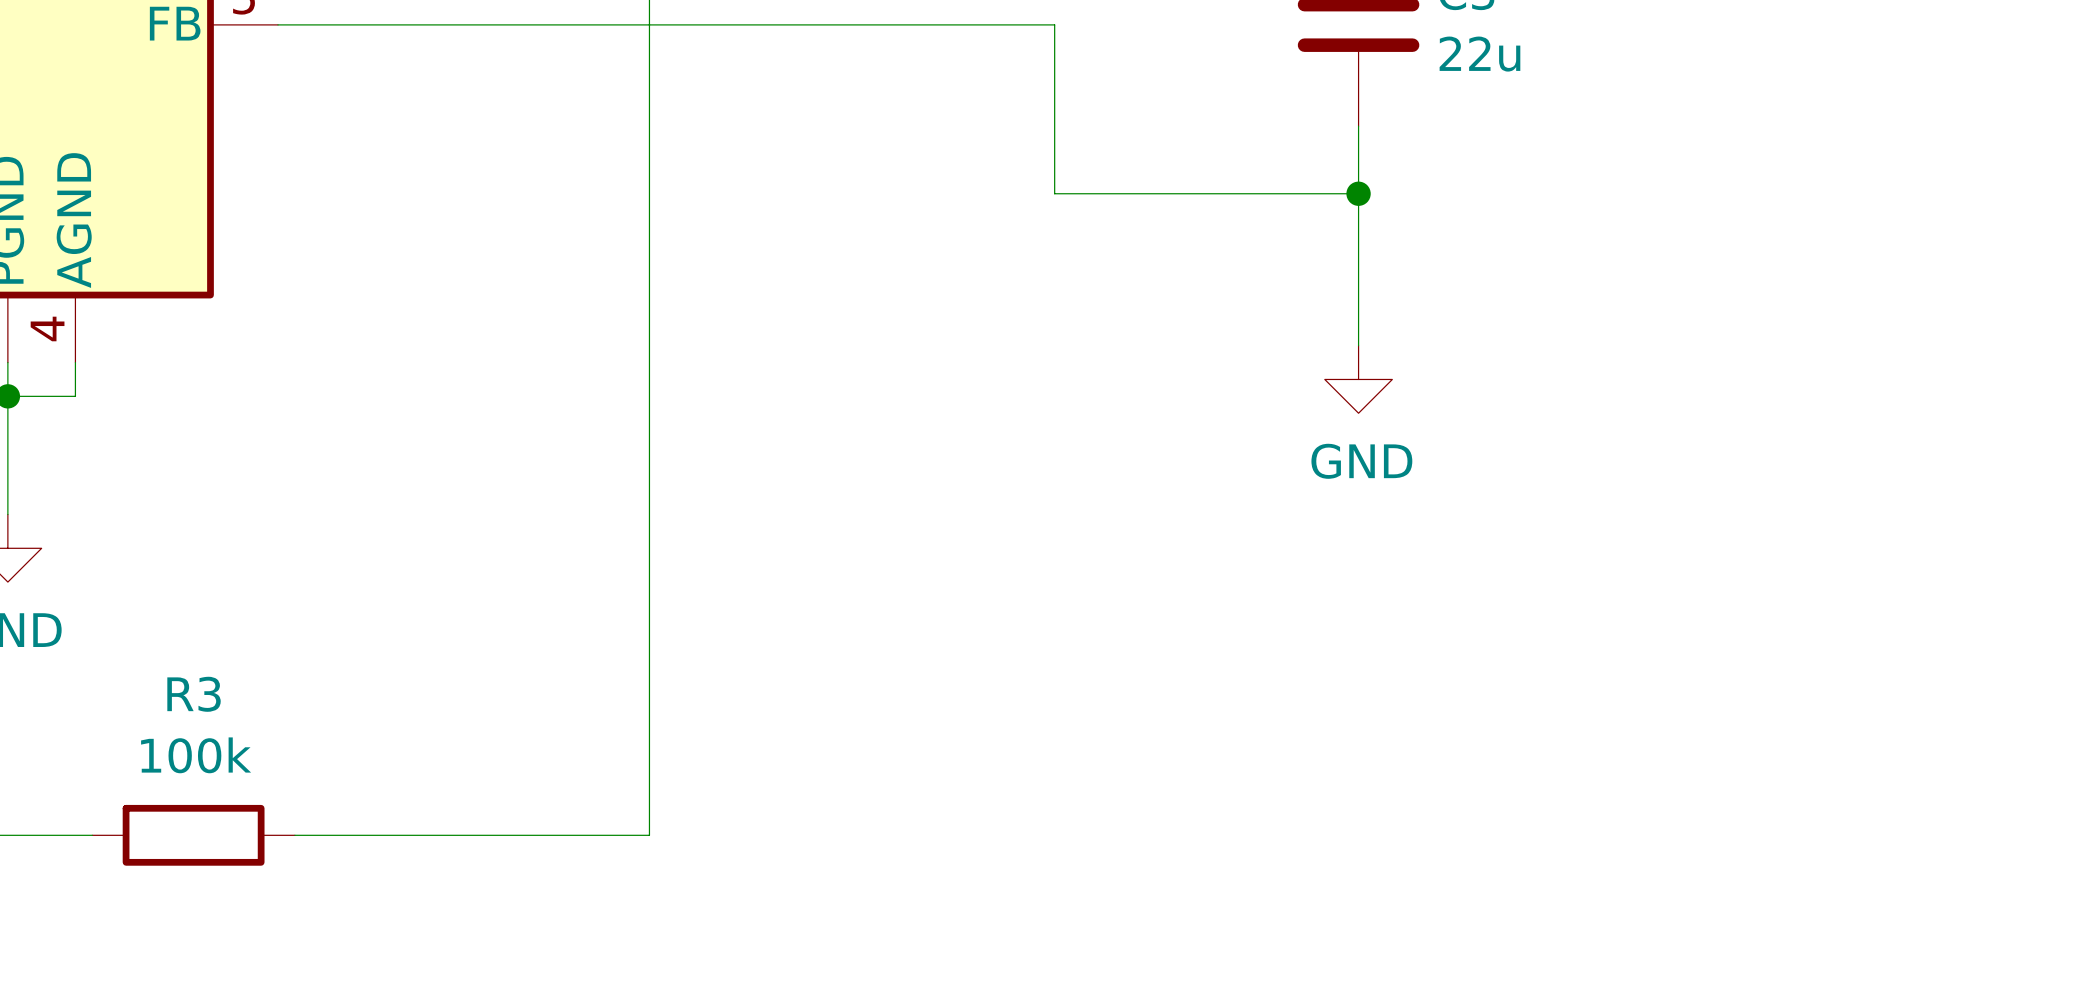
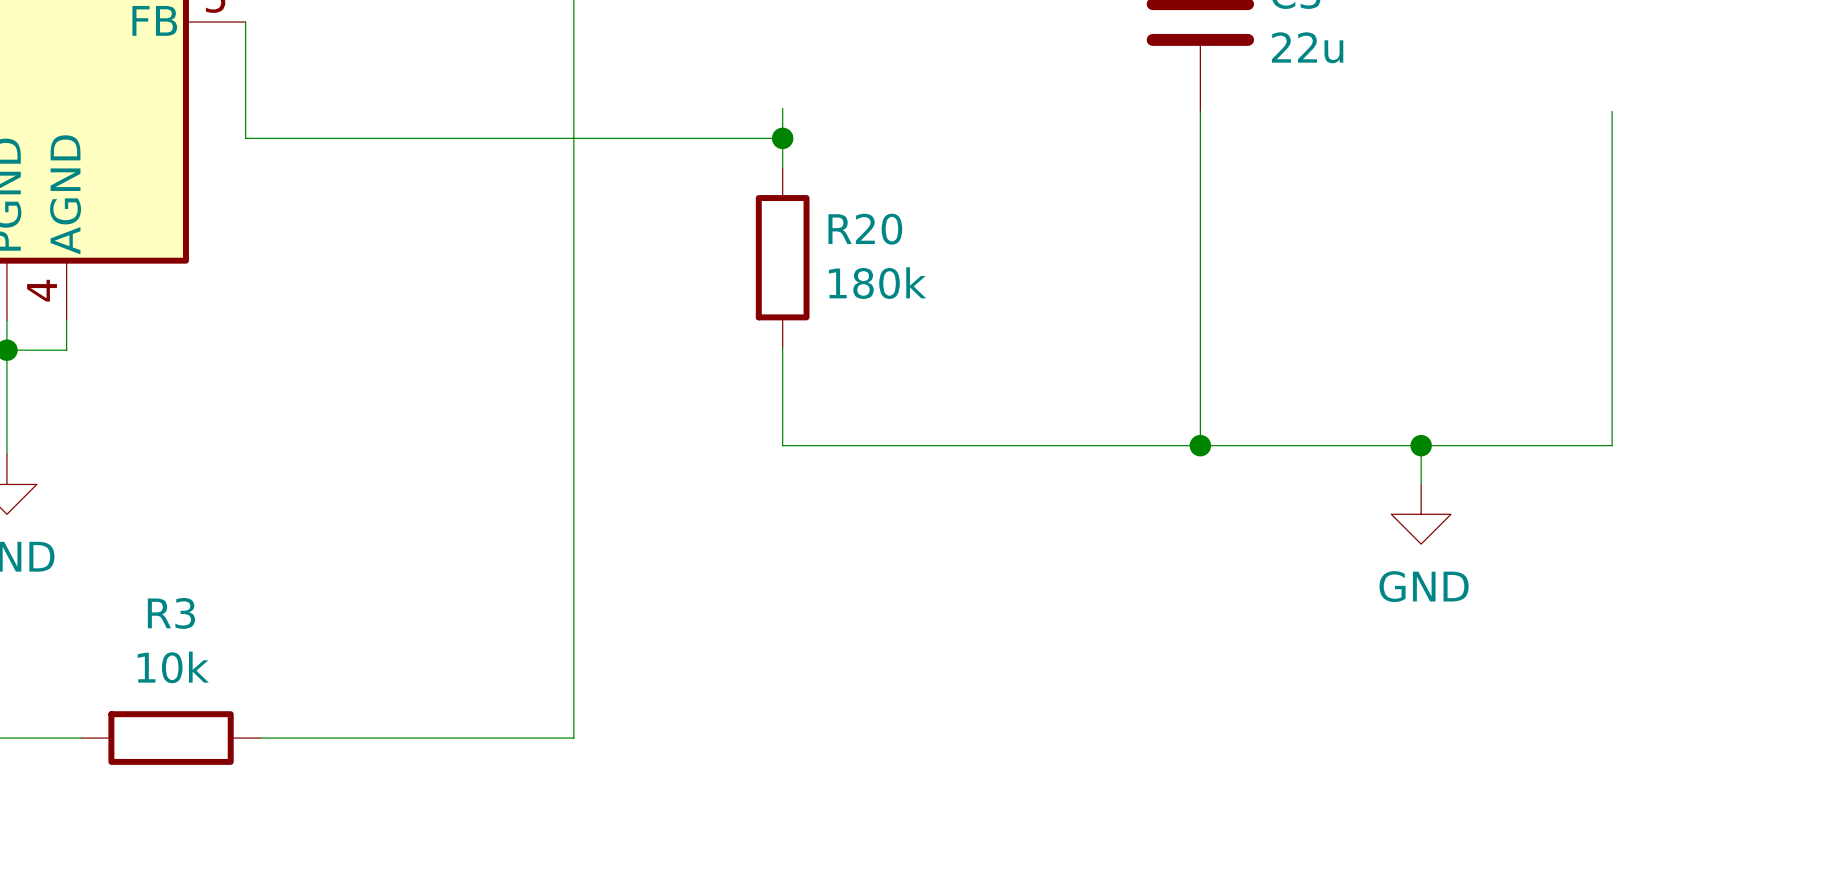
wire: (278, 24) (1054, 24) (1054, 193) (1358, 193) -> (245, 22) (245, 138) (782, 138)
wire: none -> (782, 108) (782, 168)
wire: none -> (1612, 111) (1612, 445) (782, 445) (782, 347)
junction: none -> (782, 138)
junction: (1358, 193) -> none
R20: none -> 180k (782, 257)
wire: none -> (1200, 305) (1200, 445)
power symbol position: GND (1358, 379) -> GND (1421, 514)
junction: none -> (1200, 445)
wire: none -> (1421, 445) (1421, 484)
junction: none -> (1421, 445)
R3 value: 100k (196, 755) -> 10k (173, 667)

